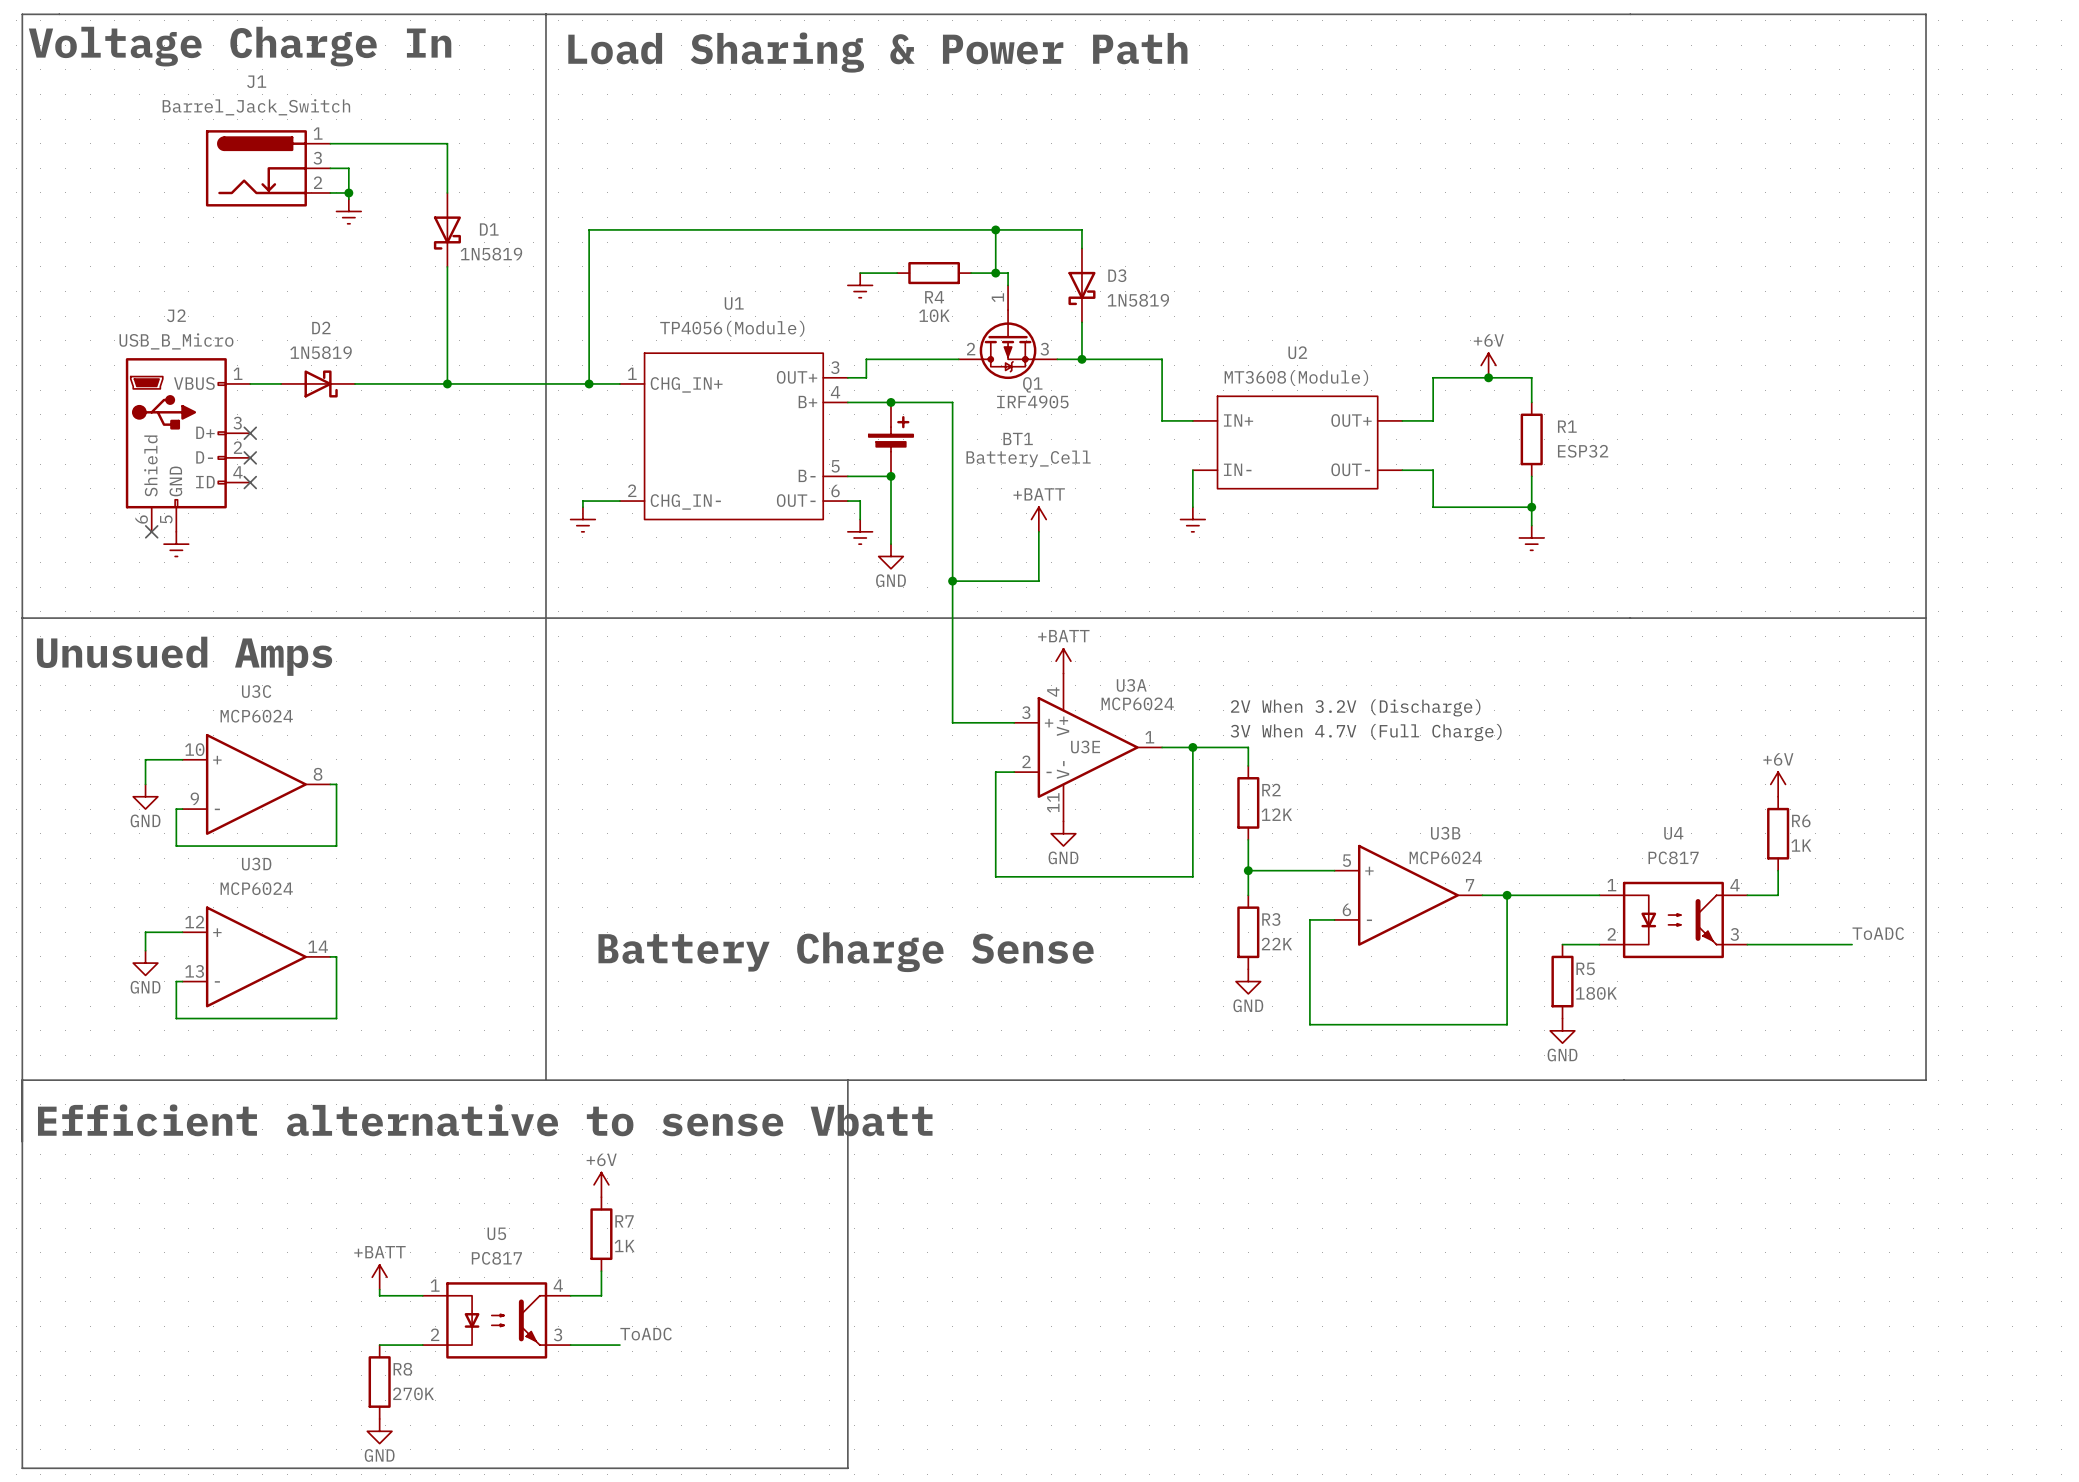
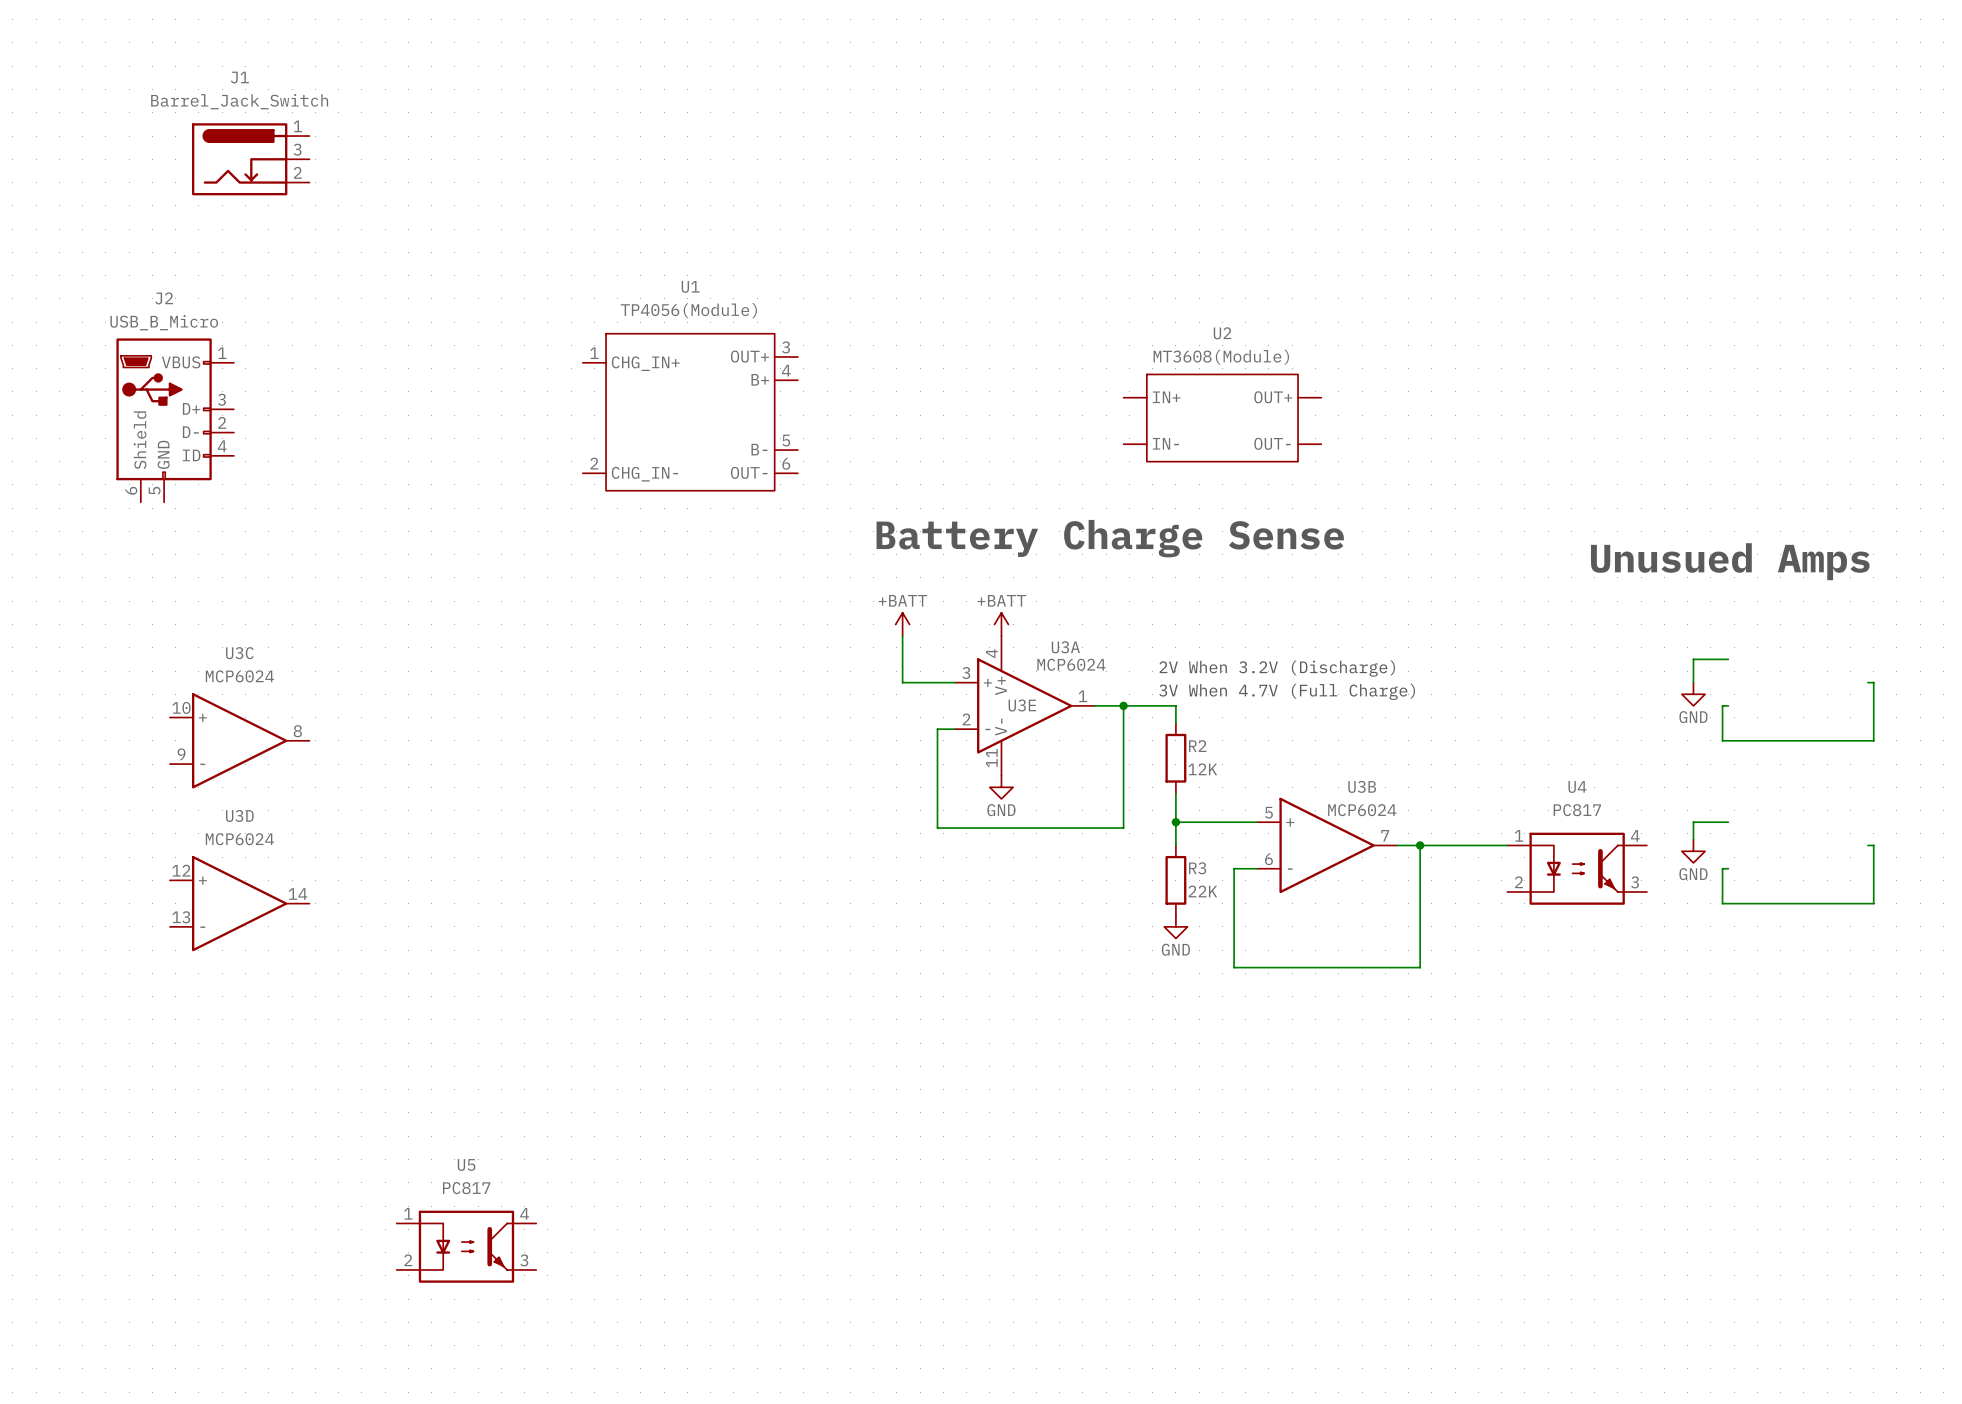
line: (545, 14) (545, 1080) -> none
text: Voltage Charge In (240, 46) -> none
text: Load Sharing & Power Path (877, 52) -> none
wire: (330, 143) (447, 143) (447, 192) -> none
wire: (330, 168) (348, 168) (348, 199) -> none
wire: (330, 192) (348, 192) -> none
junction: (348, 192) -> none
power symbol: (348, 211) -> none
D1: 1N5819 (447, 229) -> none
wire: (995, 229) (995, 273) -> none
junction: (995, 229) -> none
wire: (1081, 248) (1081, 229) (589, 229) (589, 383) -> none
wire: (447, 266) (447, 383) -> none
wire: (860, 273) (897, 273) -> none
R4: 10K (934, 273) -> none
wire: (971, 273) (1008, 273) (1008, 285) -> none
junction: (995, 273) -> none
power symbol: (860, 285) -> none
D3: 1N5819 (1081, 285) -> none
wire: (1081, 322) (1081, 359) -> none
Q1: IRF4905 (1008, 332) -> none
wire: (958, 359) (866, 359) (866, 377) (847, 377) -> none
wire: (1057, 359) (1162, 359) (1162, 420) (1192, 420) -> none
junction: (1081, 359) -> none
power symbol: +6V (1488, 365) -> none
junction: (1488, 377) -> none
wire: (250, 383) (281, 383) -> none
D2: 1N5819 (318, 383) -> none
wire: (355, 383) (619, 383) -> none
junction: (447, 383) -> none
junction: (589, 383) -> none
wire: (847, 402) (952, 402) (952, 722) (958, 722) -> (902, 636) (902, 682)
junction: (890, 402) -> none
wire: (1531, 402) (1531, 377) (1433, 377) (1433, 420) (1402, 420) -> none
no-connect mark: (250, 433) -> none
BT1: Battery_Cell (890, 439) -> none
R1: ESP32 (1531, 439) -> none
no-connect mark: (250, 457) -> none
wire: (1192, 470) (1192, 507) -> none
wire: (1402, 470) (1433, 470) (1433, 507) (1531, 507) -> none
wire: (847, 476) (890, 476) (890, 544) -> none
junction: (890, 476) -> none
wire: (1531, 476) (1531, 525) -> none
no-connect mark: (250, 482) -> none
wire: (619, 501) (582, 501) (582, 507) -> none
wire: (847, 501) (860, 501) (860, 519) -> none
junction: (1531, 507) -> none
power symbol: (582, 519) -> none
power symbol position: +BATT (1038, 519) -> +BATT (902, 624)
power symbol: (1192, 519) -> none
no-connect mark: (151, 531) -> none
power symbol: (860, 531) -> none
wire: (1038, 531) (1038, 581) (952, 581) -> none
power symbol: (1531, 537) -> none
power symbol: (176, 544) -> none
power symbol: GND (890, 556) -> none
text: none -> Battery Charge Sense (1110, 538)
junction: (952, 581) -> none
text: none -> Unusued Amps (1730, 561)
line: (22, 618) (1926, 618) -> none
line: (22, 618) (22, 1468) (847, 1468) (847, 1080) -> none
line: (22, 618) (22, 14) (1926, 14) (1926, 1080) (22, 1080) -> none
text: Unusued Amps (184, 656) -> none
wire: none -> (1728, 659) (1693, 659) (1693, 682)
wire: none -> (1867, 682) (1873, 682) (1873, 740) (1722, 740) (1722, 705) (1728, 705)
power symbol: none -> GND (1693, 694)
wire: (182, 759) (145, 759) (145, 784) -> none
wire: (330, 784) (336, 784) (336, 846) (176, 846) (176, 809) (182, 809) -> none
power symbol: +6V (1778, 784) -> none
power symbol: GND (145, 796) -> none
R6: 1K (1778, 833) -> none
wire: (1778, 870) (1778, 895) (1747, 895) -> none
wire: none -> (1728, 822) (1693, 822) (1693, 839)
wire: none -> (1867, 845) (1873, 845) (1873, 903) (1722, 903) (1722, 868) (1728, 868)
power symbol: none -> GND (1693, 851)
wire: (182, 932) (145, 932) (145, 950) -> none
label: ToADC (1878, 933) -> none
wire: (1562, 944) (1599, 944) -> none
wire: (1747, 944) (1852, 944) -> none
text: Battery Charge Sense (846, 952) -> none
wire: (330, 956) (336, 956) (336, 1018) (176, 1018) (176, 981) (182, 981) -> none
power symbol: GND (145, 963) -> none
R5: 180K (1562, 981) -> none
power symbol: GND (1562, 1030) -> none
text: Efficient alternative to sense Vbatt (485, 1120) -> none
power symbol: +6V (601, 1184) -> none
R7: 1K (601, 1234) -> none
wire: (601, 1271) (601, 1295) (570, 1295) -> none
power symbol: +BATT (379, 1277) -> none
wire: (379, 1289) (379, 1295) (422, 1295) -> none
label: ToADC (646, 1334) -> none
wire: (379, 1345) (422, 1345) -> none
wire: (570, 1345) (619, 1345) -> none
R8: 270K (379, 1382) -> none
power symbol: GND (379, 1431) -> none

